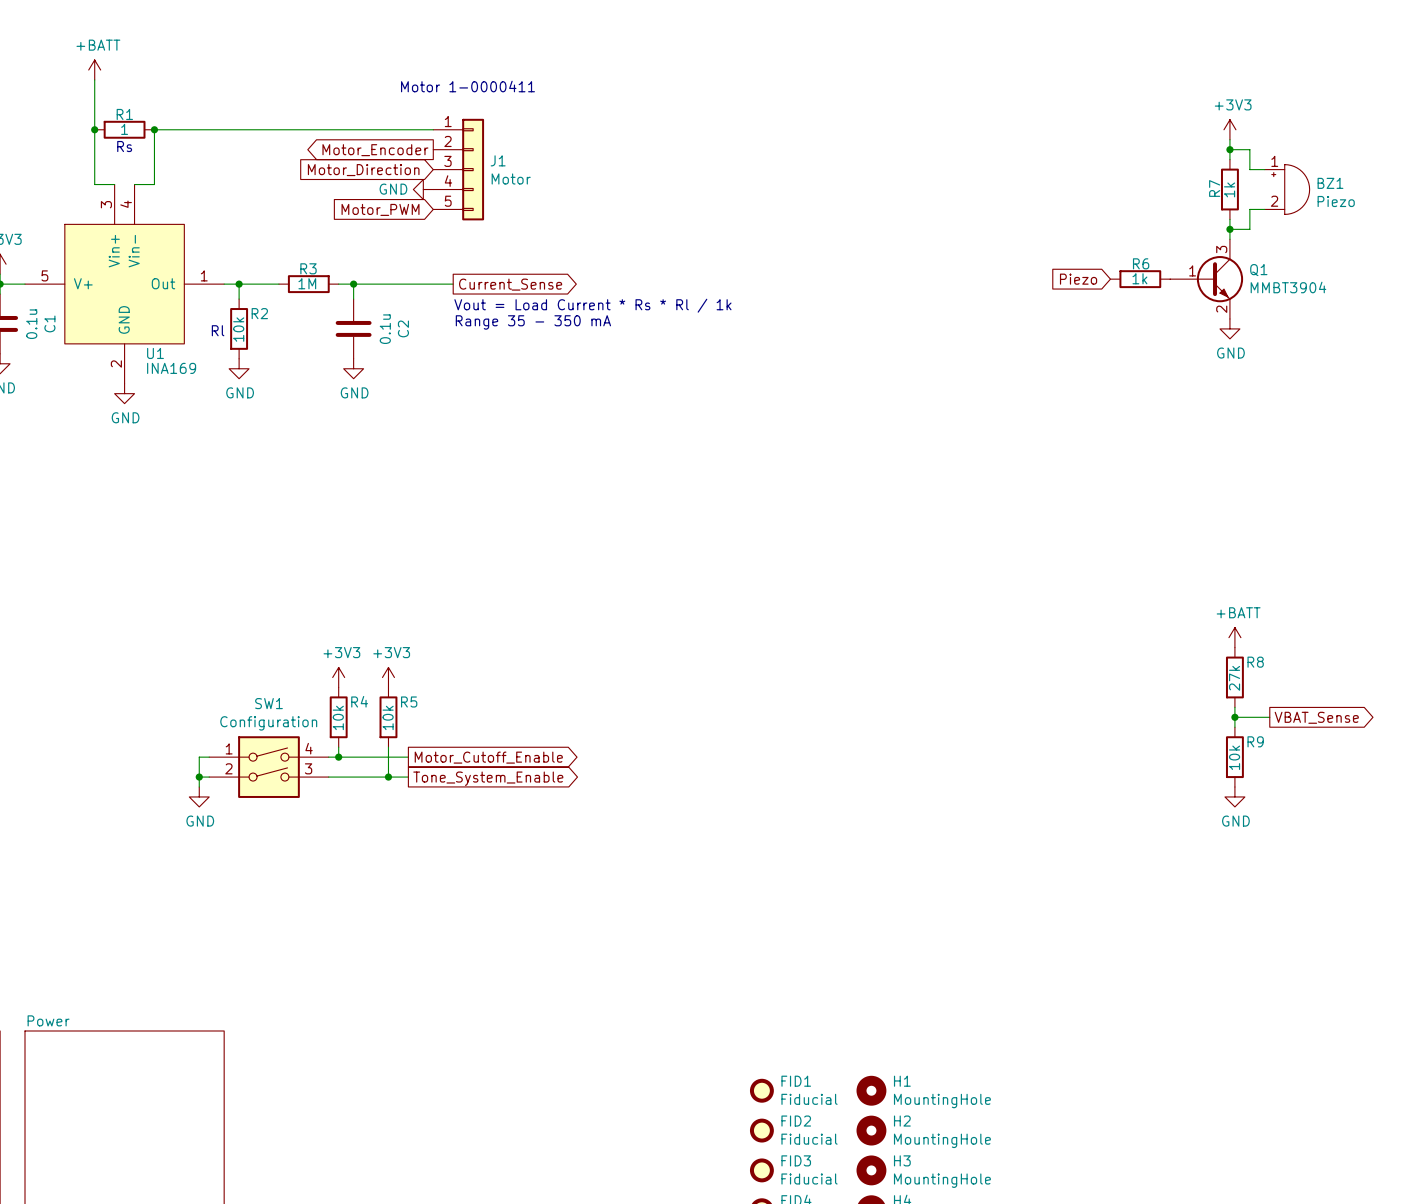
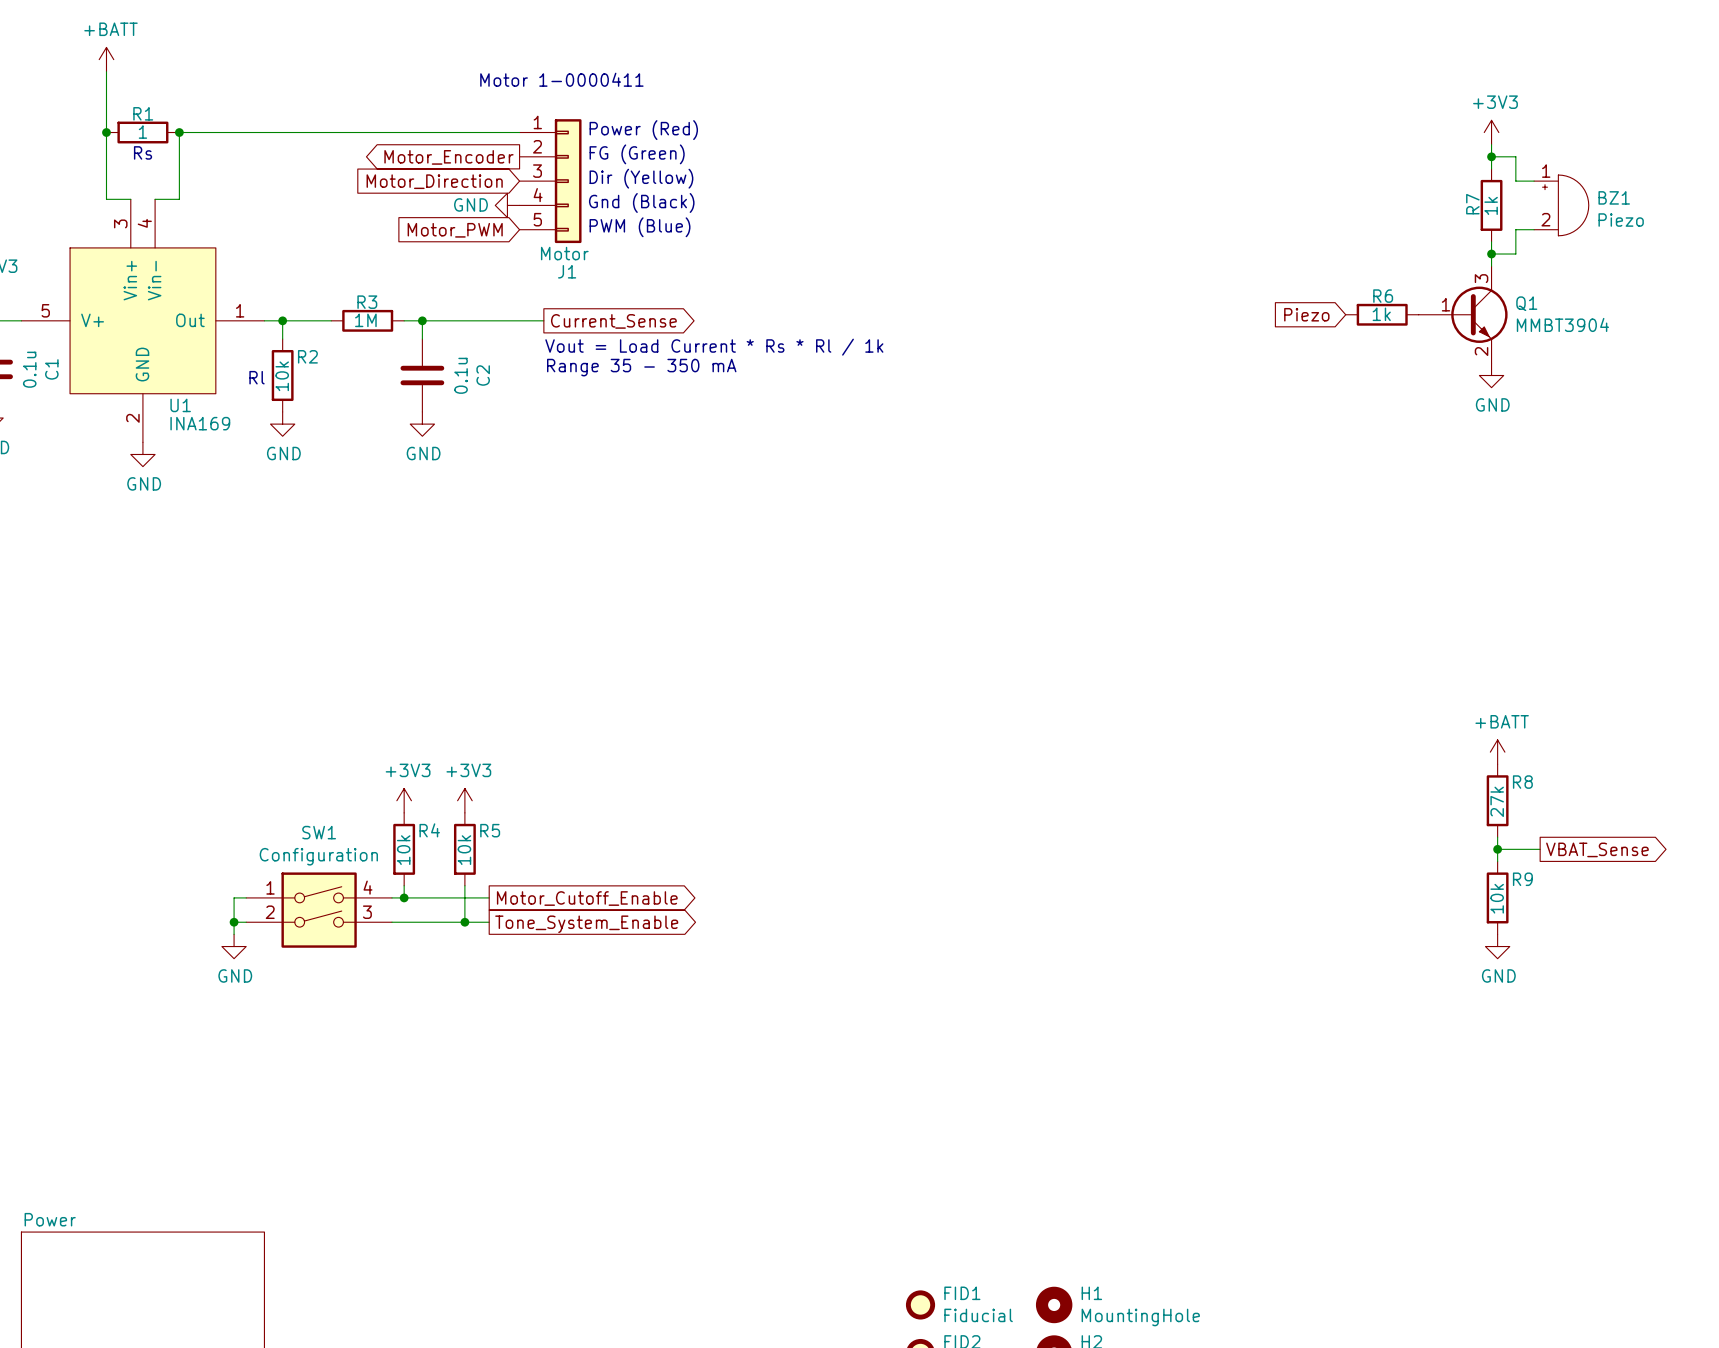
text: none -> Power (Red) (643, 130)
text: none -> FG (Green) (637, 154)
J1 name position: J1 (498, 160) -> J1 (567, 271)
text: none -> Dir (Yellow) (641, 178)
J1 value position: Motor (511, 178) -> Motor (564, 253)
text: none -> Gnd (Black) (641, 202)
text: none -> PWM (Blue) (640, 227)

